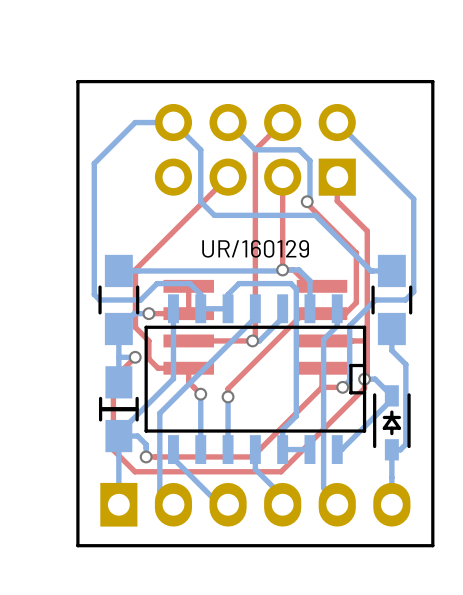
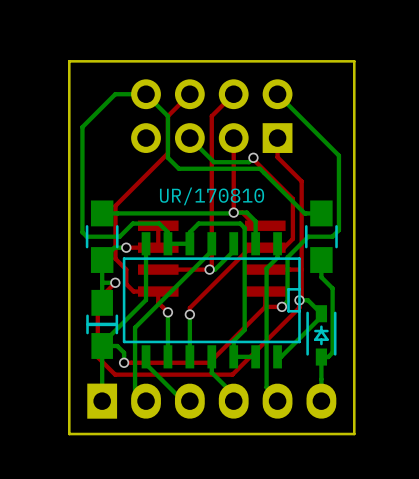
bottom track: (228, 122) (255, 149) (299, 149) (309, 160) (309, 198) (307, 201) -> (189, 138) (213, 162) (249, 162) (253, 157)
top track: (228, 177) (135, 269) -> (189, 94) (167, 116) (167, 153) (115, 205) (115, 212)
text: UR/160129 (255, 248) -> UR/170810 (212, 196)

